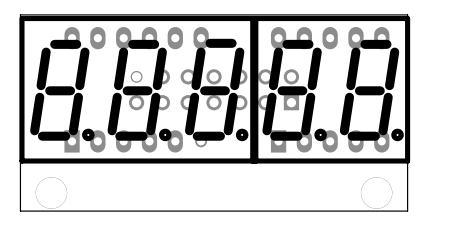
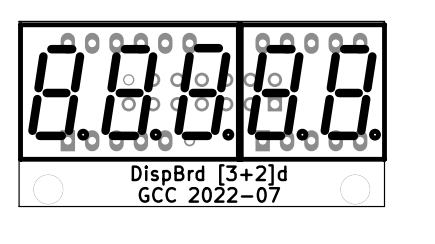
text: none -> DispBrd [3+2]d (209, 174)
text: none -> GCC 2022-07 (209, 194)

